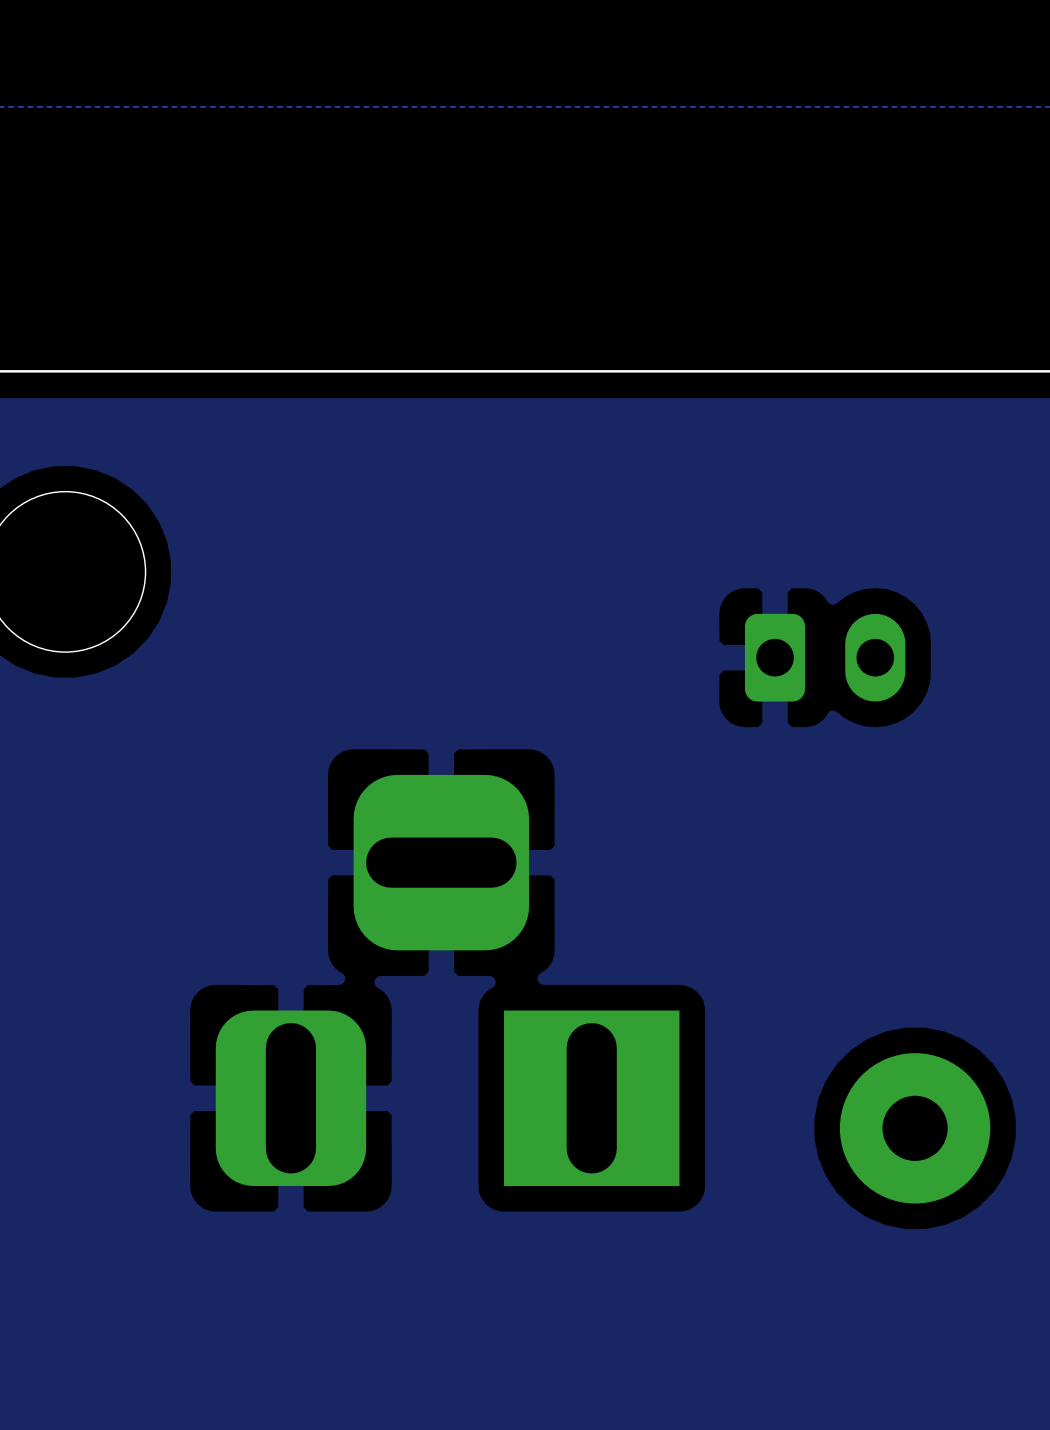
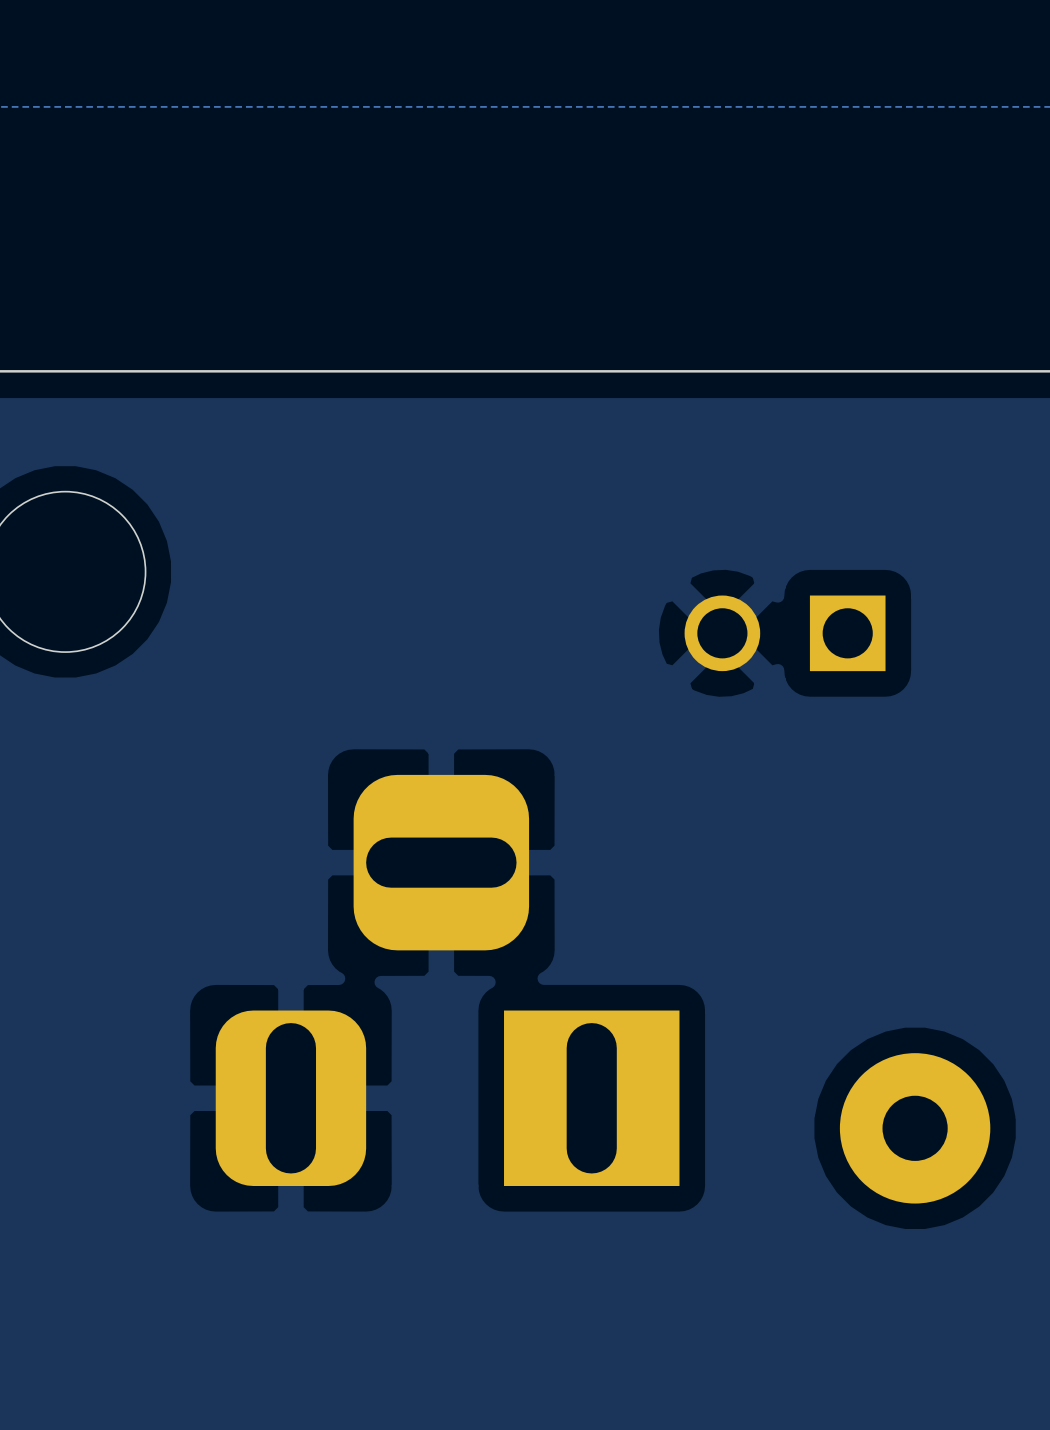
part footprint: [744, 613, 906, 702] -> [684, 595, 886, 672]

